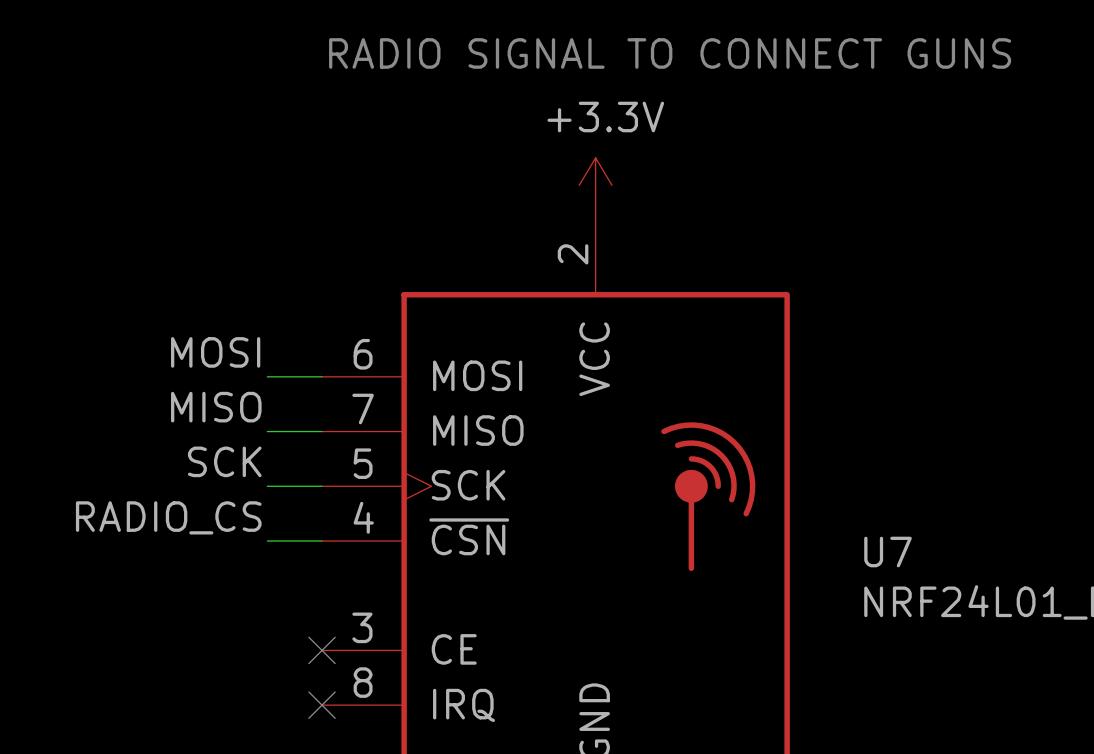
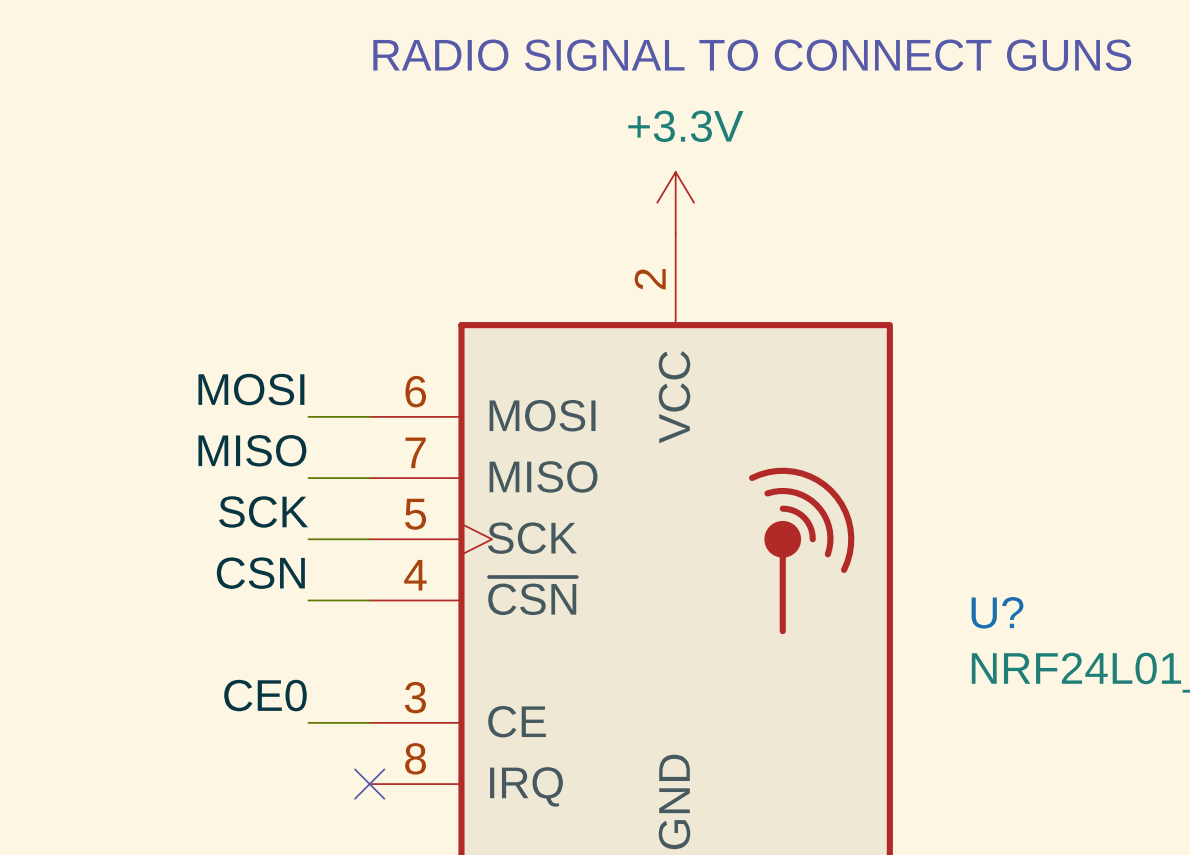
label: RADIO_CS (168, 517) -> CSN (260, 573)
U7 name: U7 (888, 552) -> U? (997, 612)
label: none -> CE0 (265, 695)
wire: none -> (308, 722) (369, 722)
no-connect mark: (322, 650) -> none

